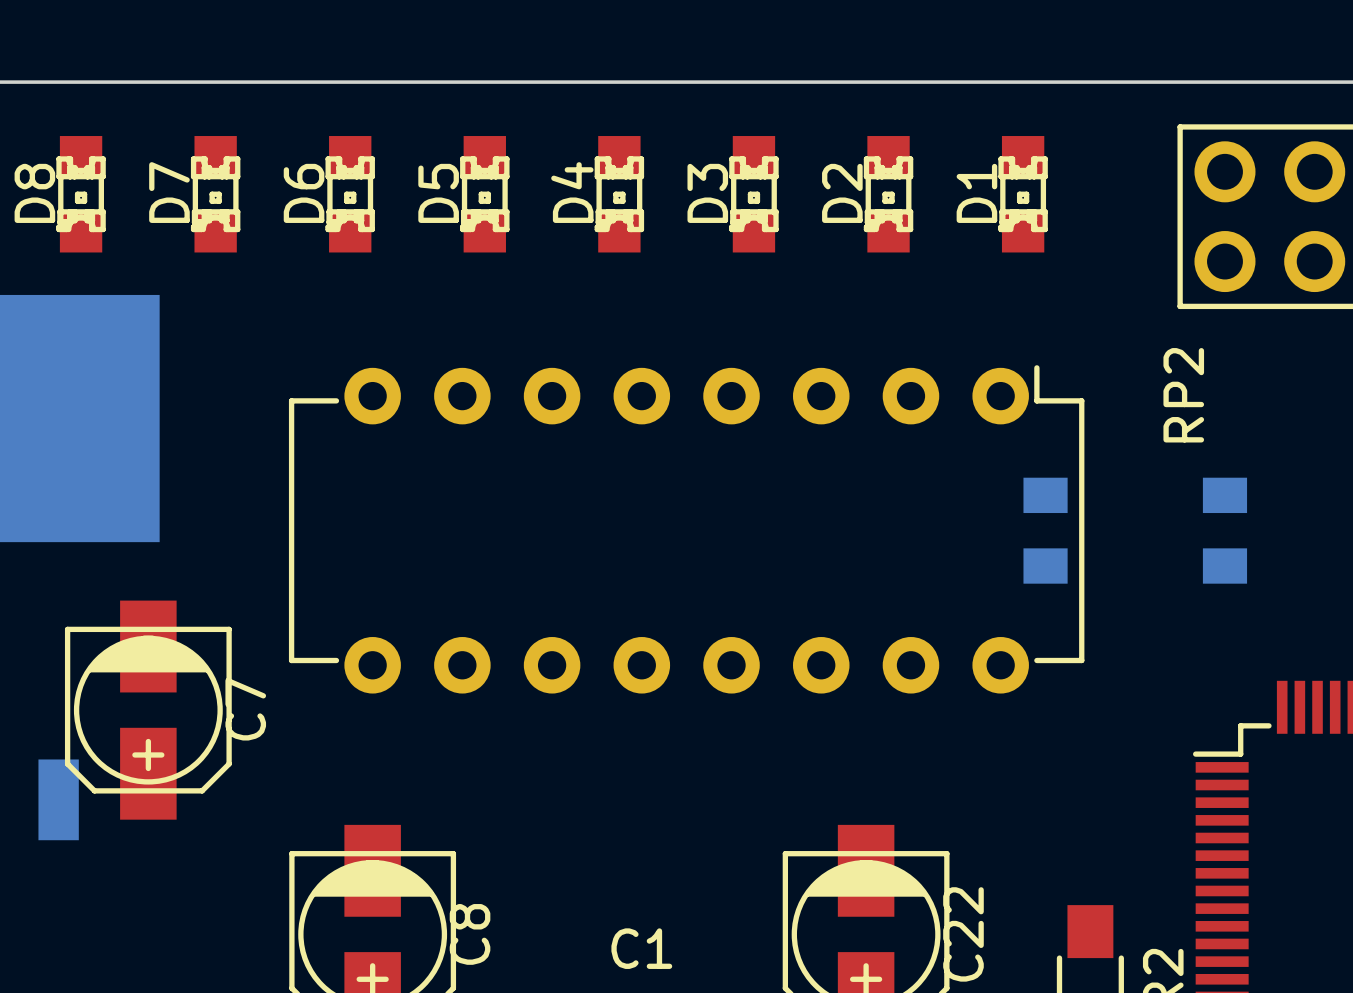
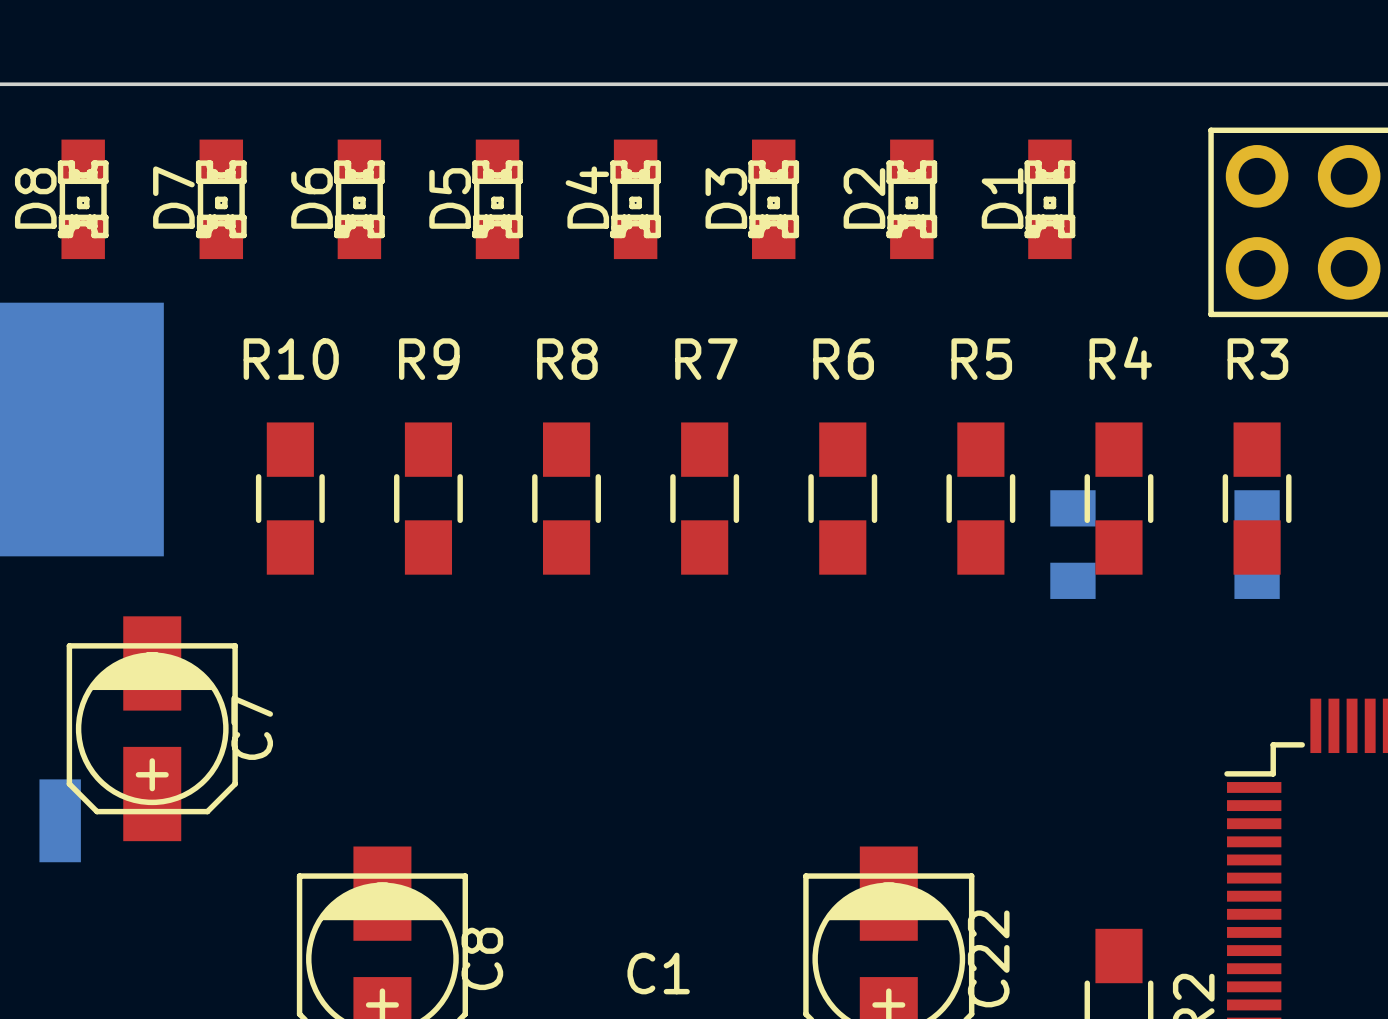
R10: none -> (290, 498)
R9: none -> (428, 498)
R8: none -> (566, 498)
R7: none -> (704, 498)
R6: none -> (842, 498)
R5: none -> (980, 498)
R4: none -> (1118, 498)
R3: none -> (1257, 498)
RP2: (686, 529) -> none

